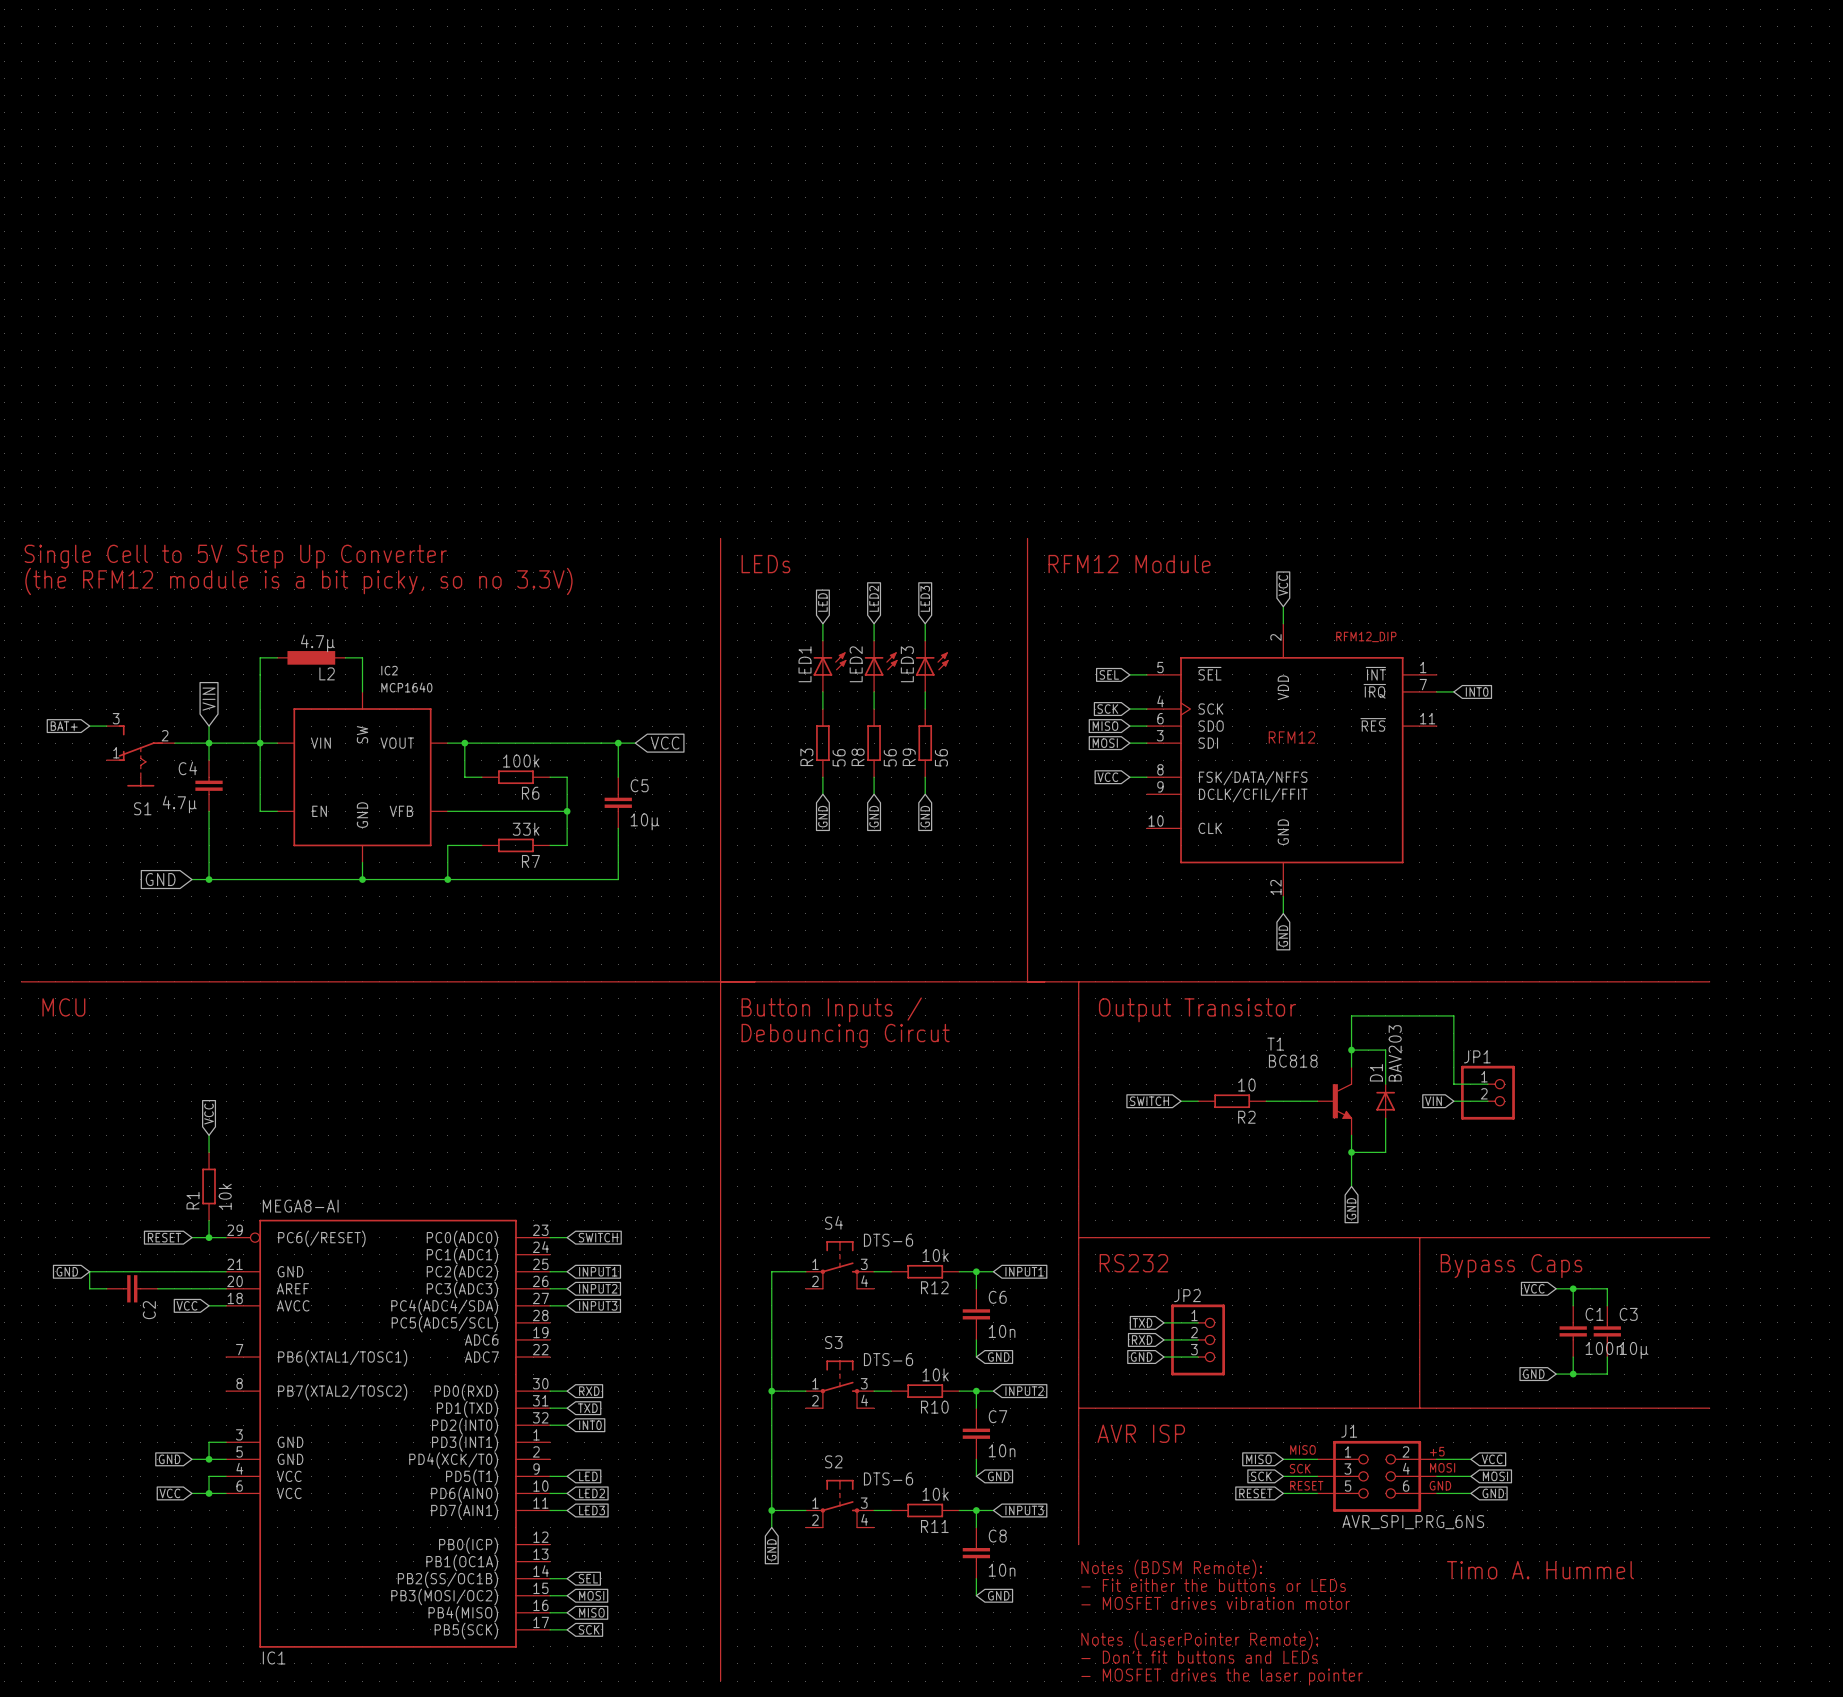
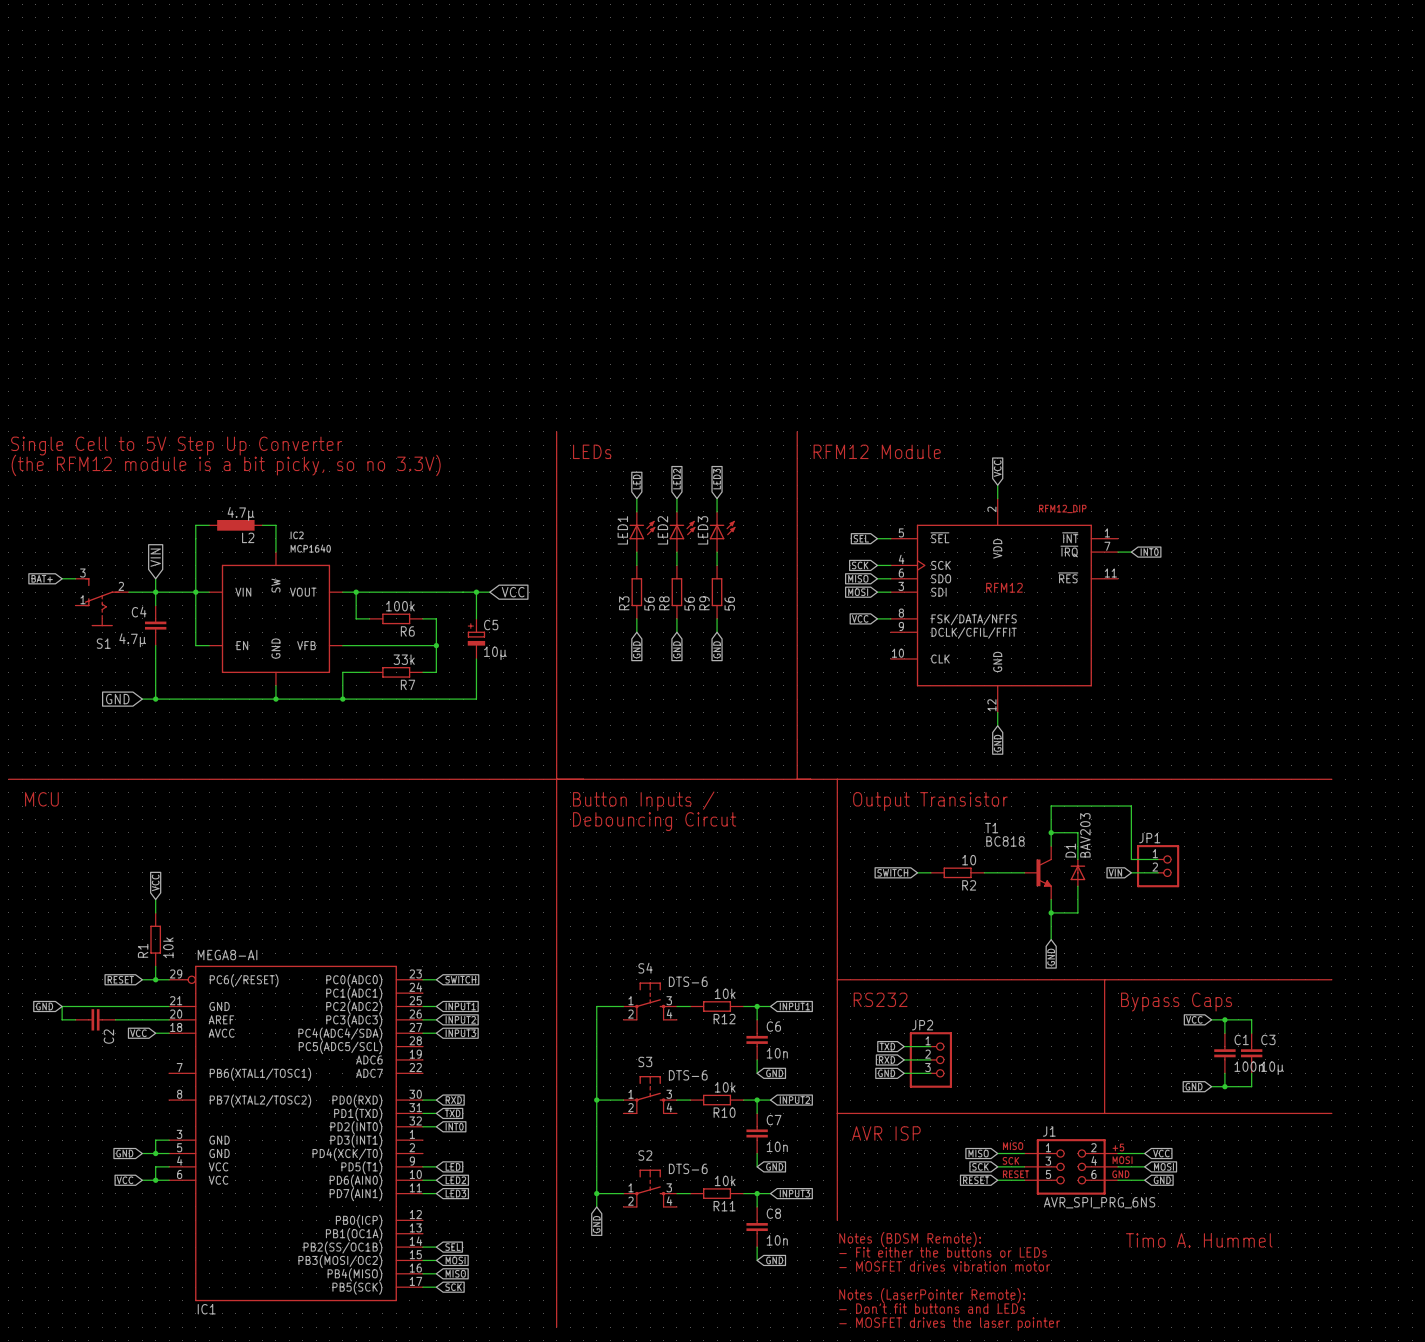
C5 symbol: [604, 777, 632, 829] -> [467, 618, 486, 659]

